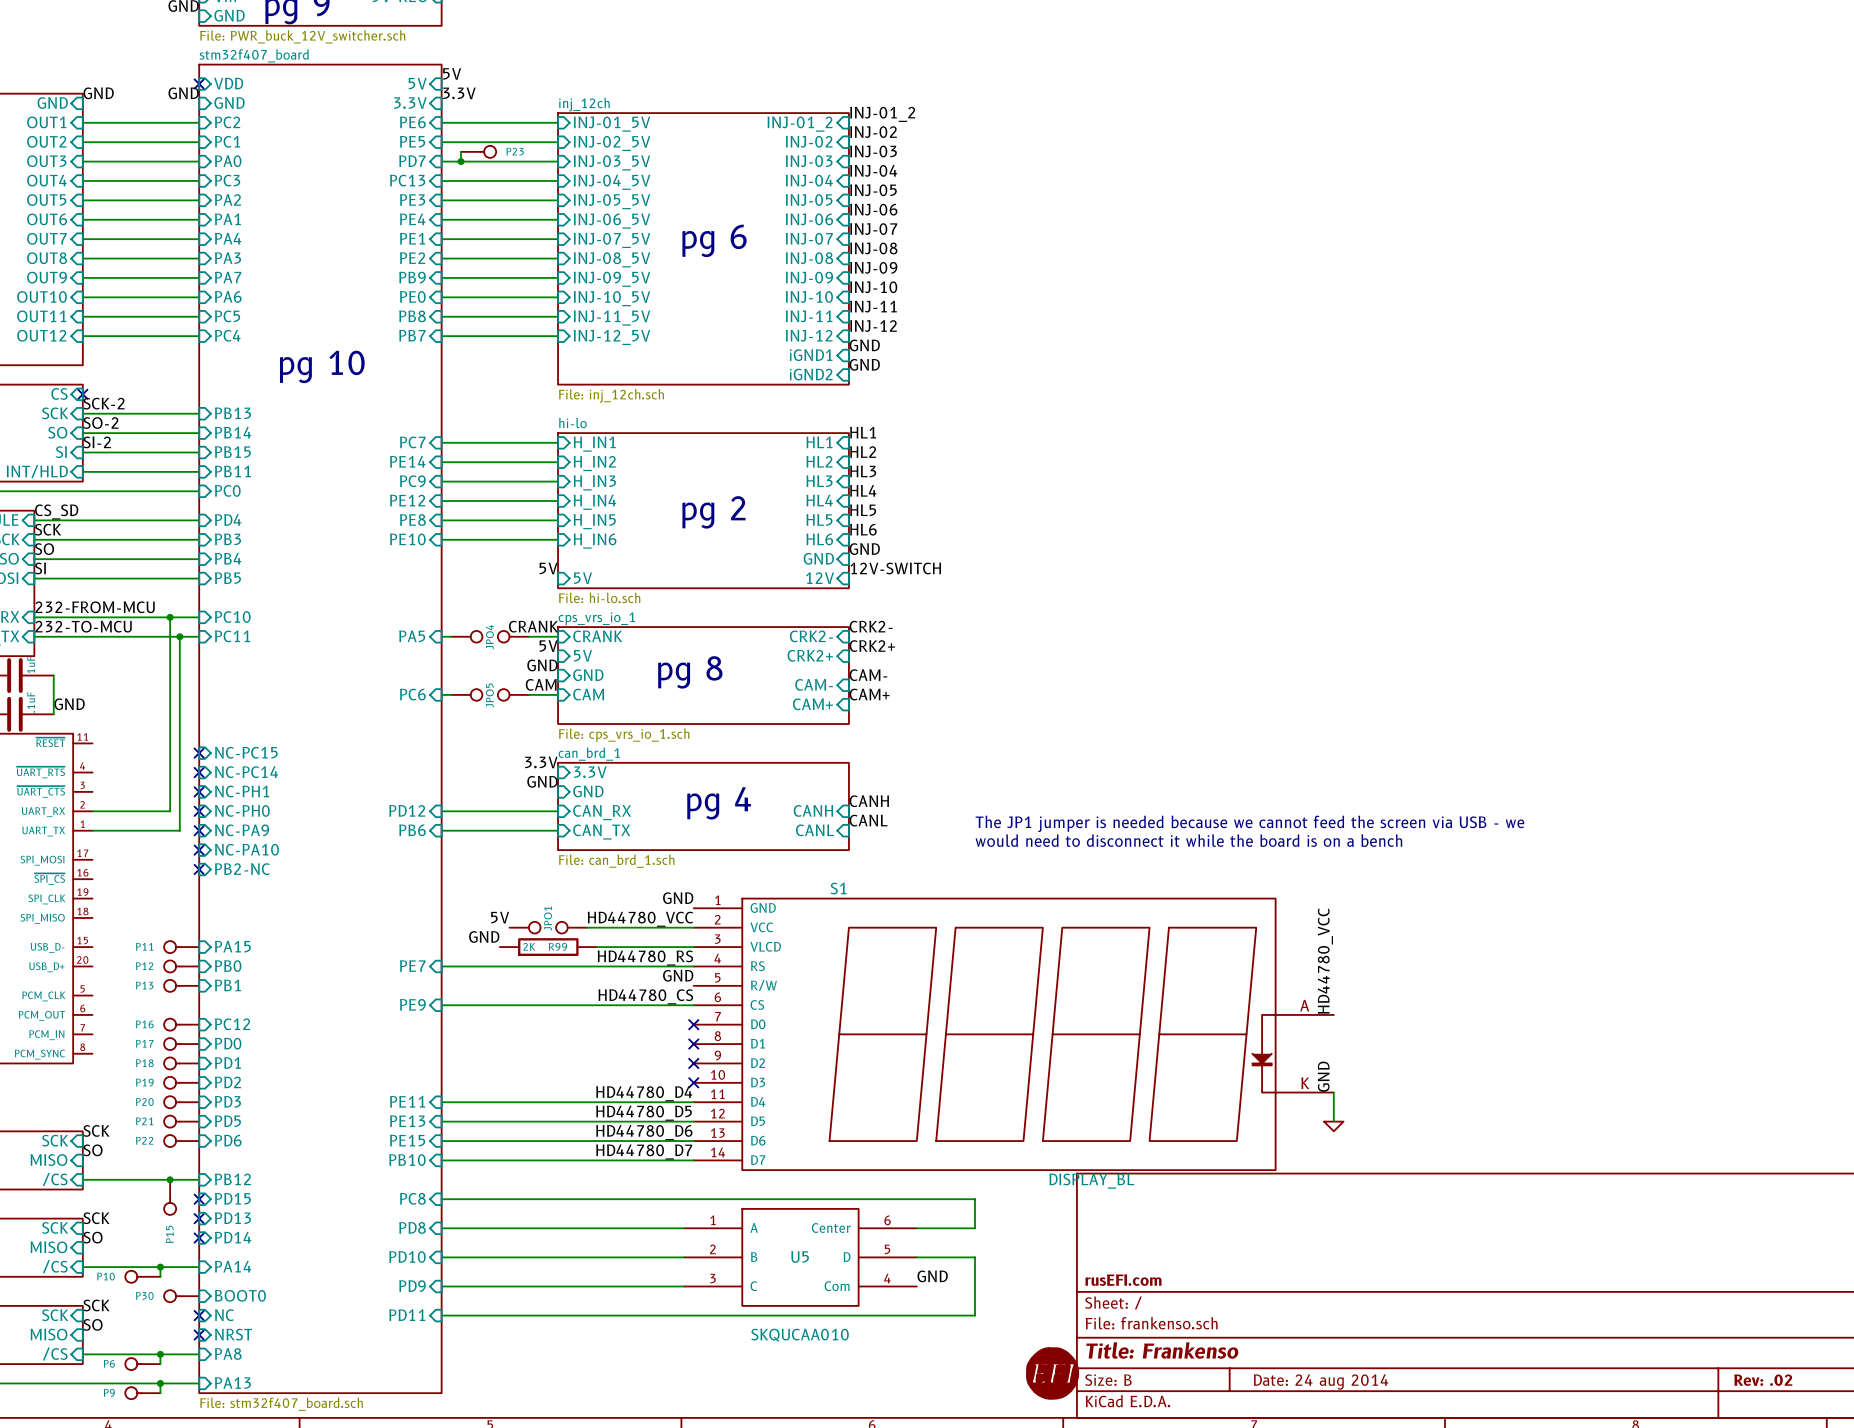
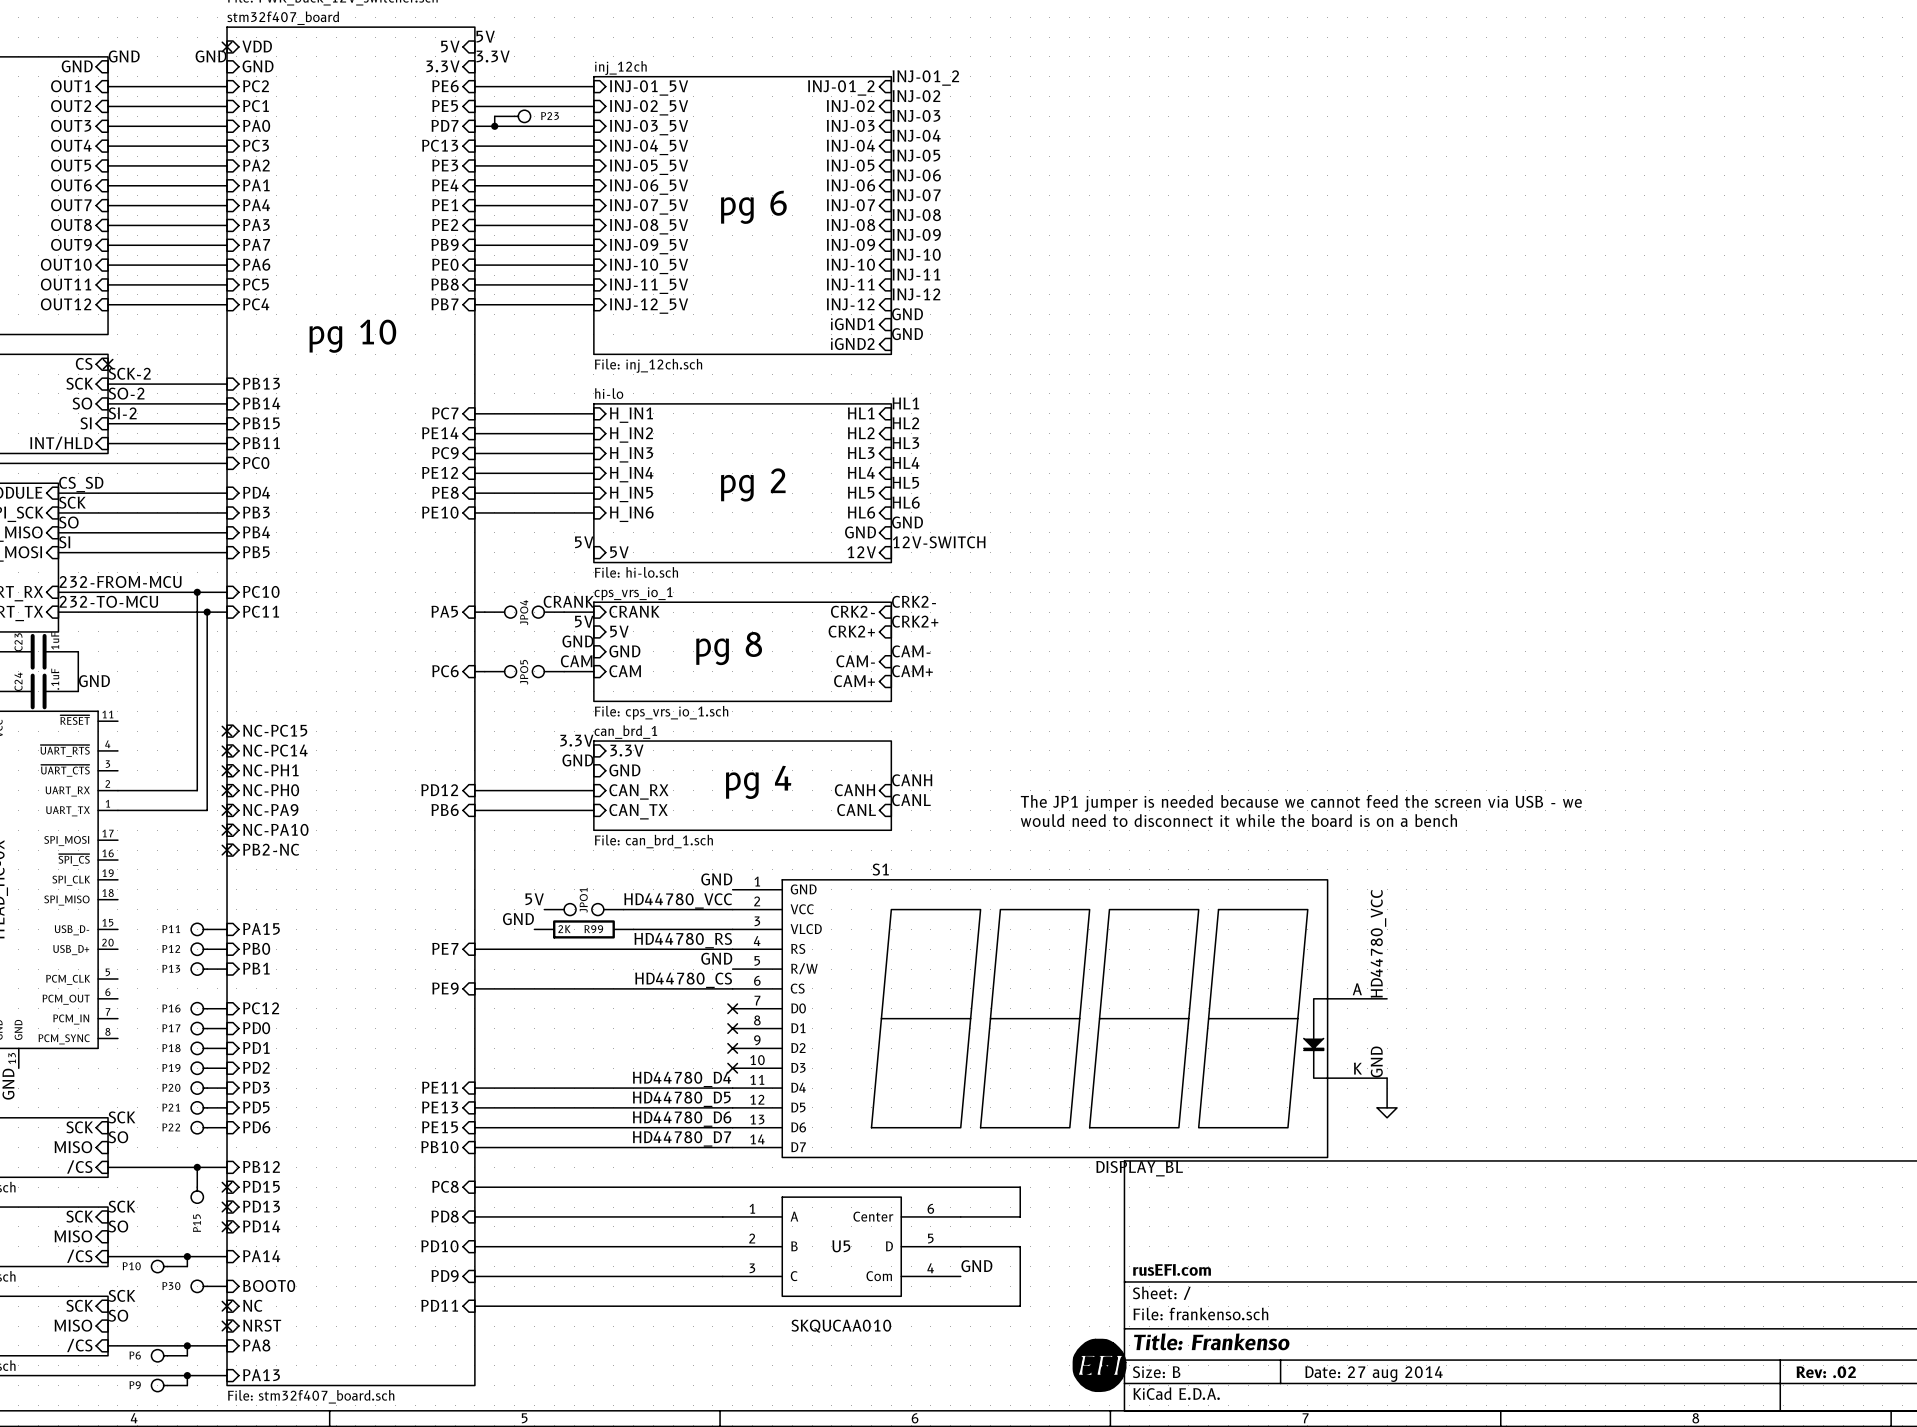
title block: Date: 24 aug 2014 (1321, 1382) -> Date: 27 aug 2014 (1374, 1374)

